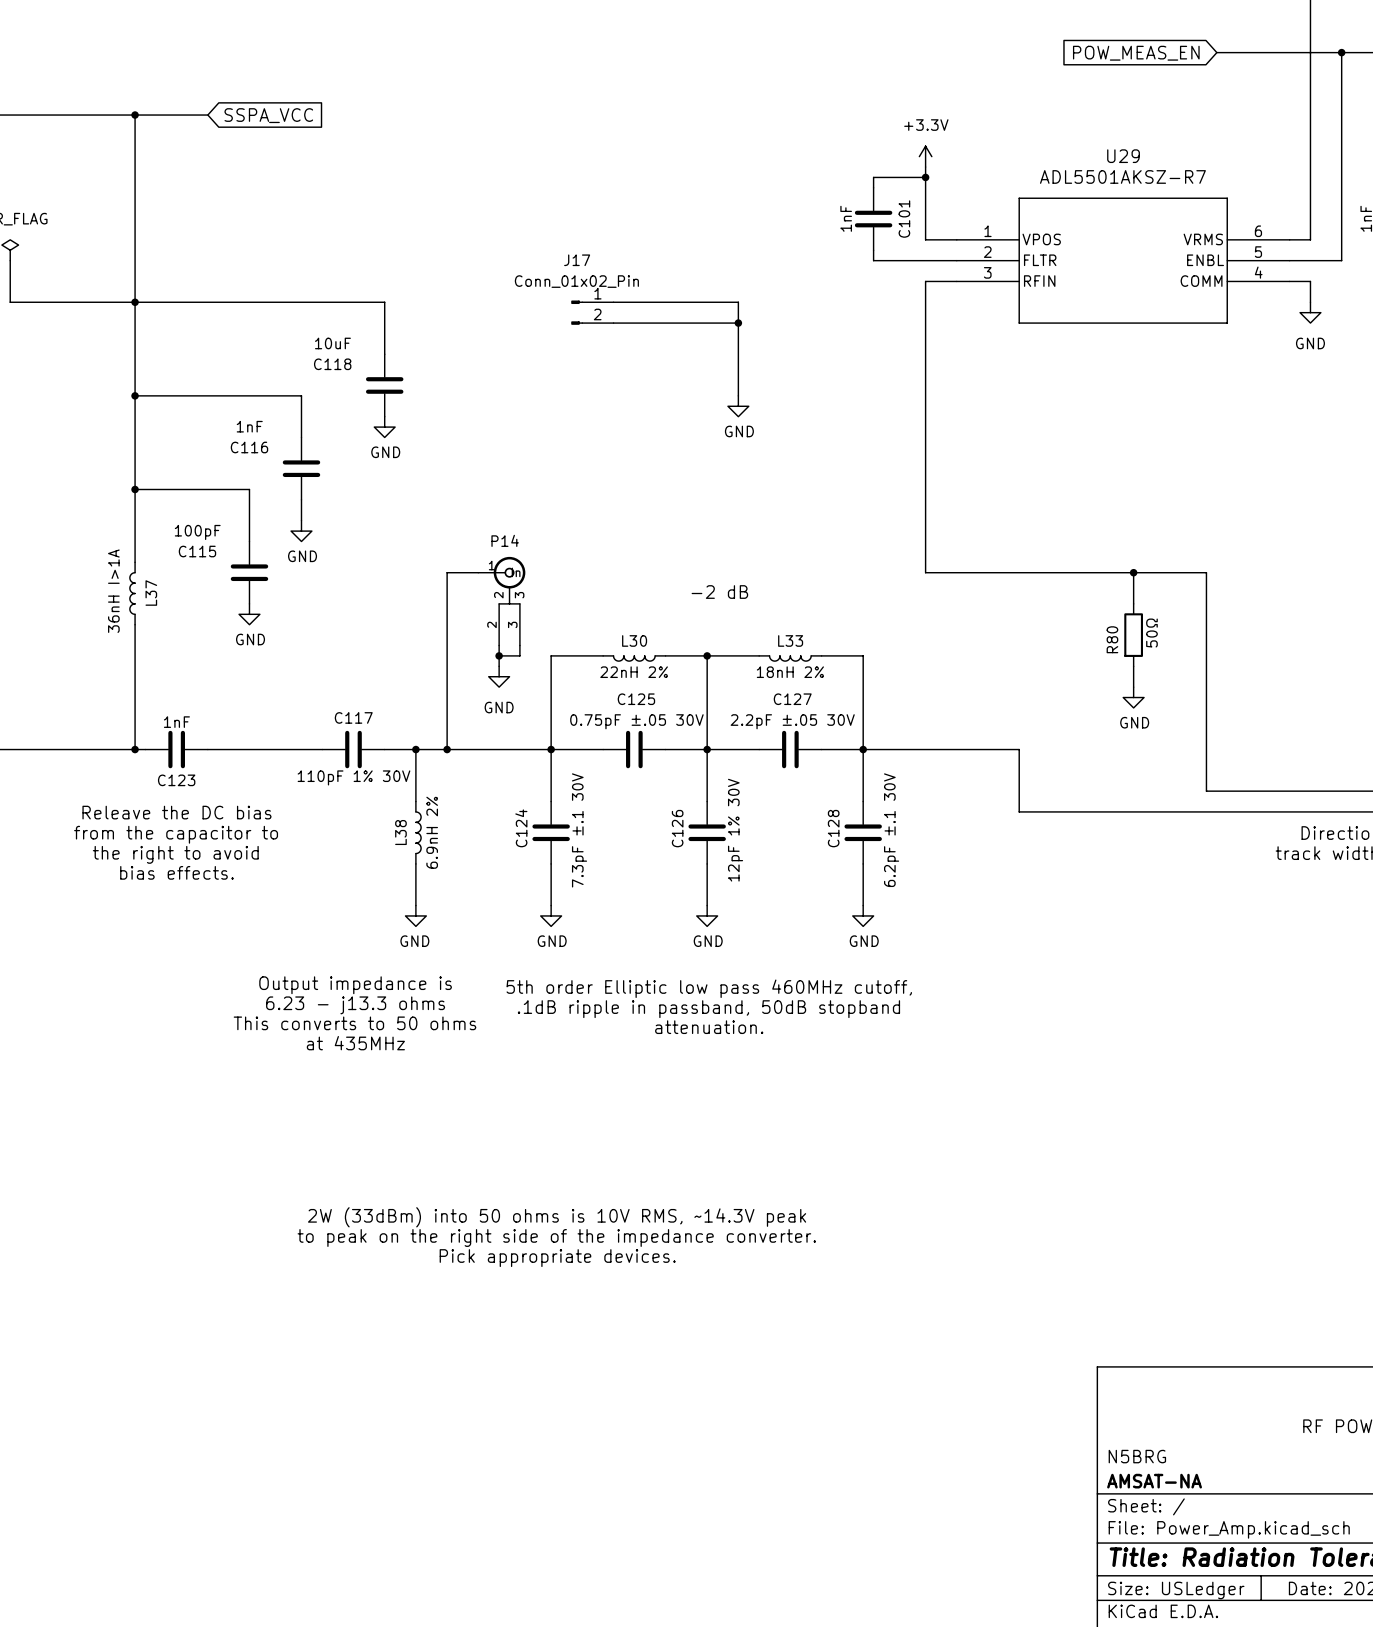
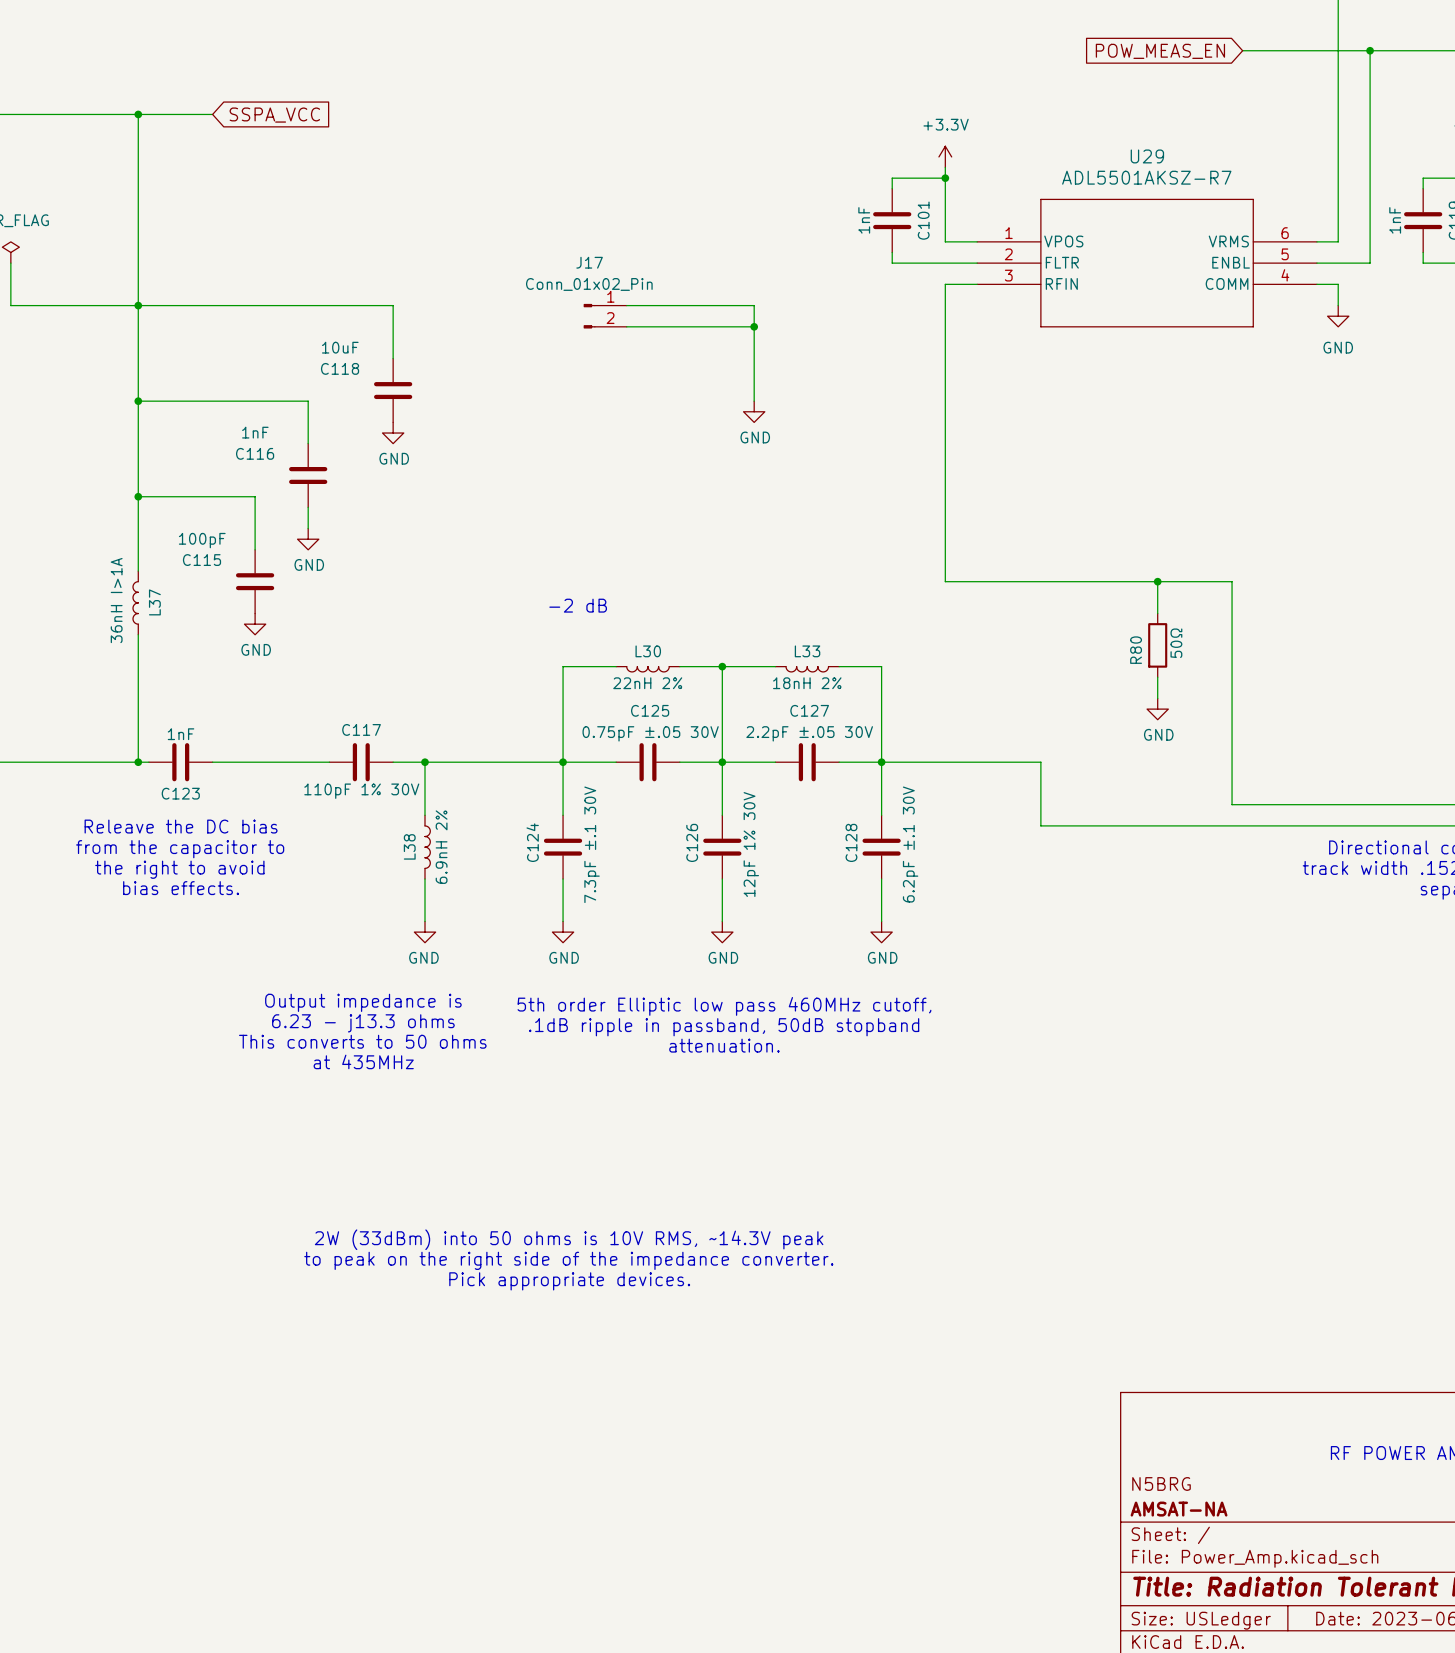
wire: (478, 572) (447, 572) (447, 749) -> none
text position: -2 dB (719, 592) -> -2 dB (578, 605)
P14: (501, 601) -> none
wire: (499, 645) (499, 666) -> none
wire: (519, 645) (519, 655) (499, 655) -> none
junction: (499, 655) -> none
power symbol: GND (499, 676) -> none
junction: (447, 749) -> none

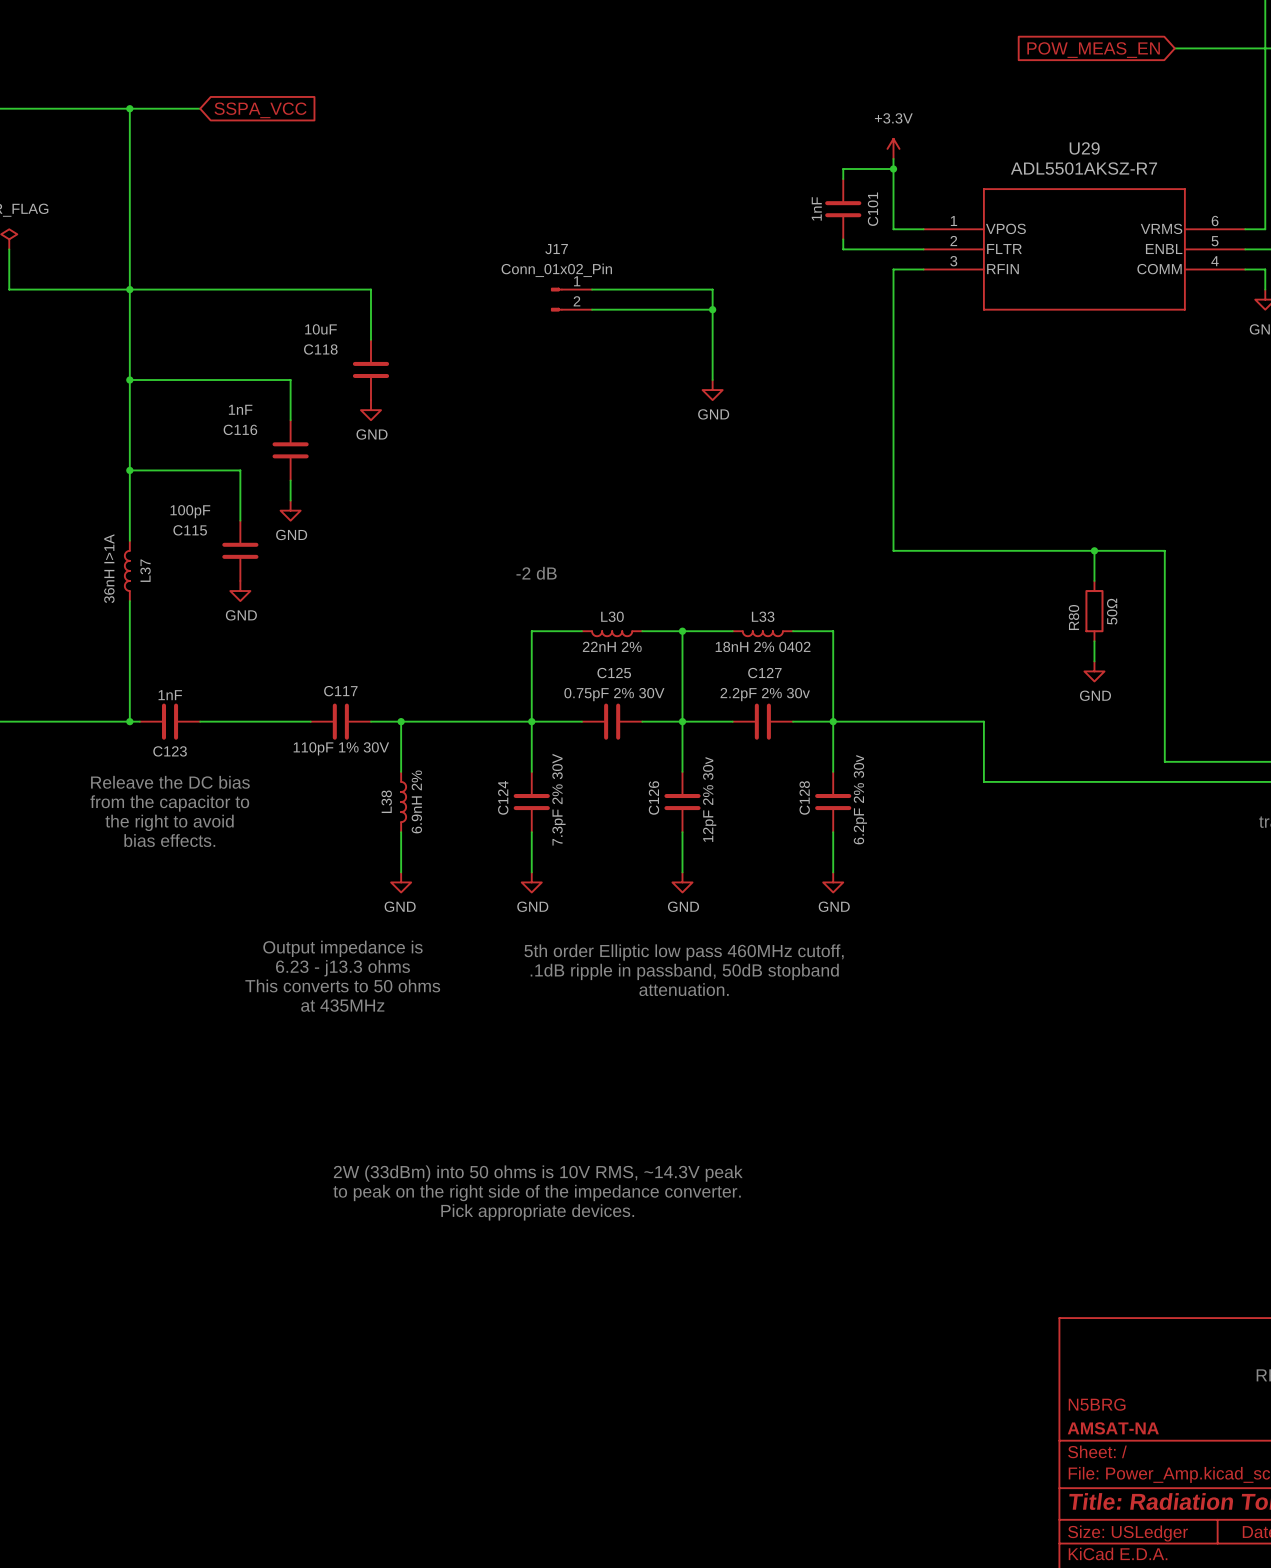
L33 value: 18nH 2% (807, 683) -> 18nH 2% 0402 (763, 646)
C125 value: 0.75pF ±.05 30V (650, 733) -> 0.75pF 2% 30V (614, 694)
C127 value: 2.2pF ±.05 30V (809, 733) -> 2.2pF 2% 30v (765, 694)
C124 value: 7.3pF ±.1 30V (592, 844) -> 7.3pF 2% 30V (558, 799)
C126 value: 12pF 1% 30V (751, 844) -> 12pF 2% 30v (709, 799)
C128 value: 6.2pF ±.1 30V (910, 844) -> 6.2pF 2% 30v (860, 799)

